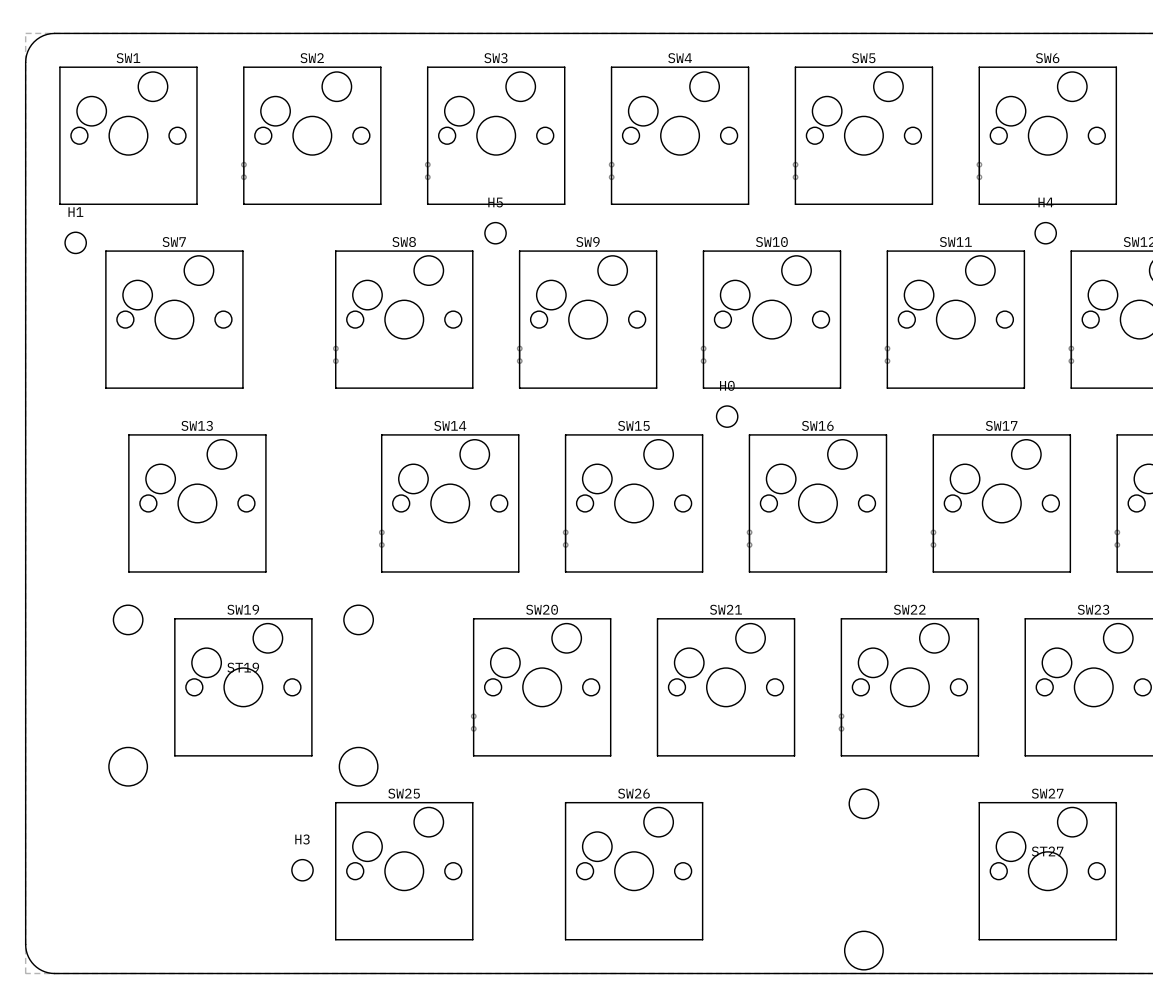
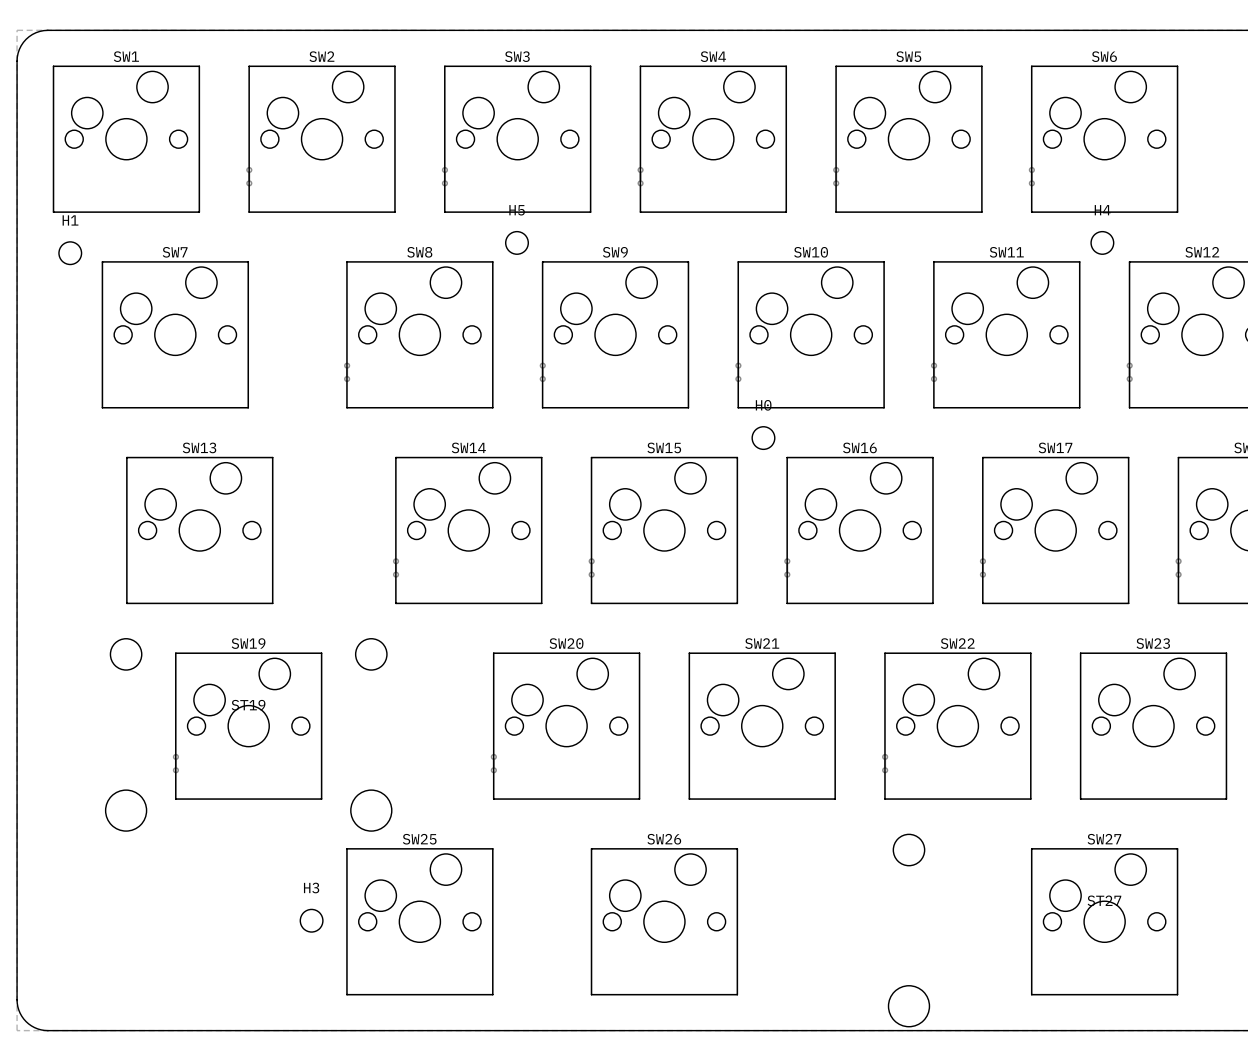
via: none -> (175, 756)
via: none -> (175, 770)

